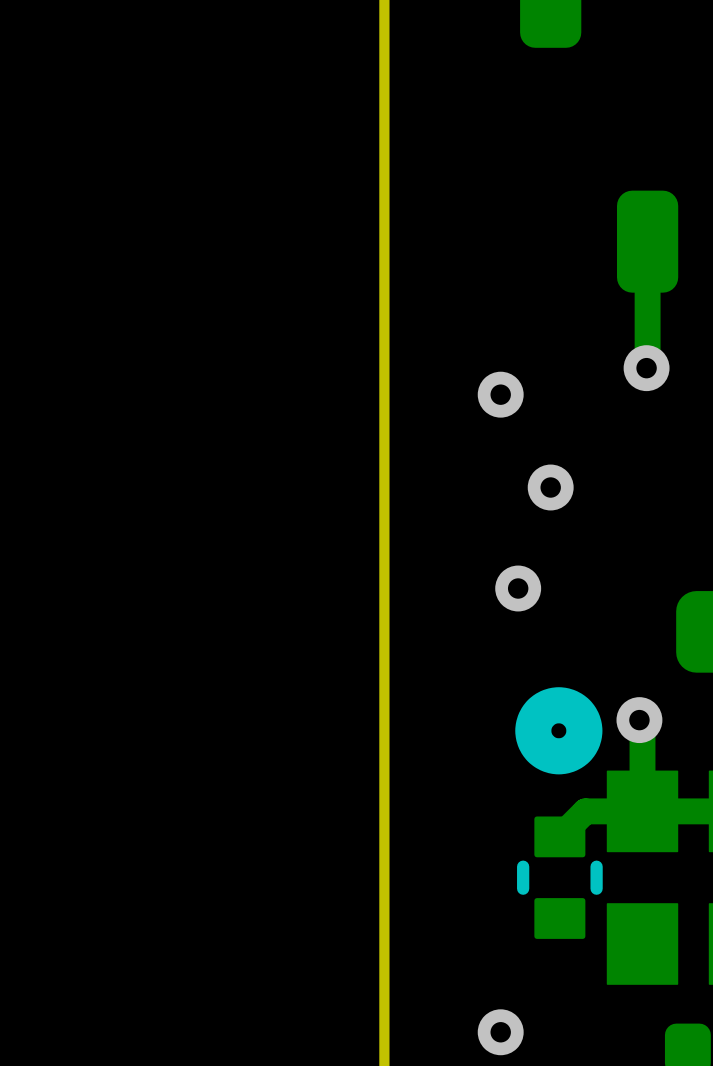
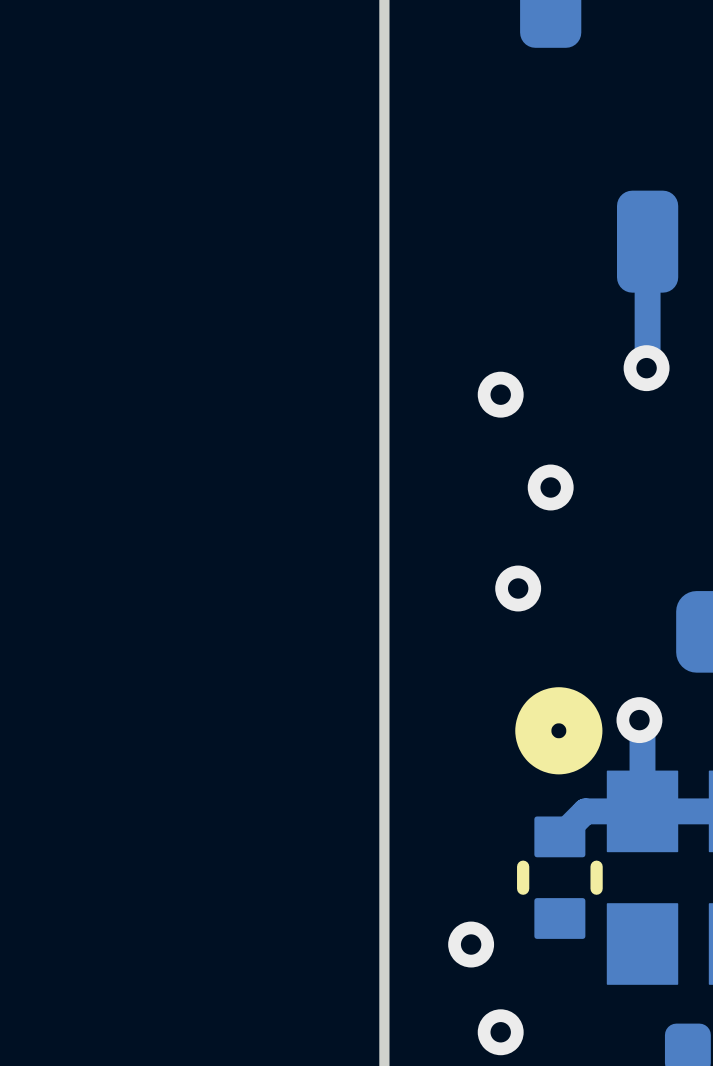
via: none -> (471, 944)

